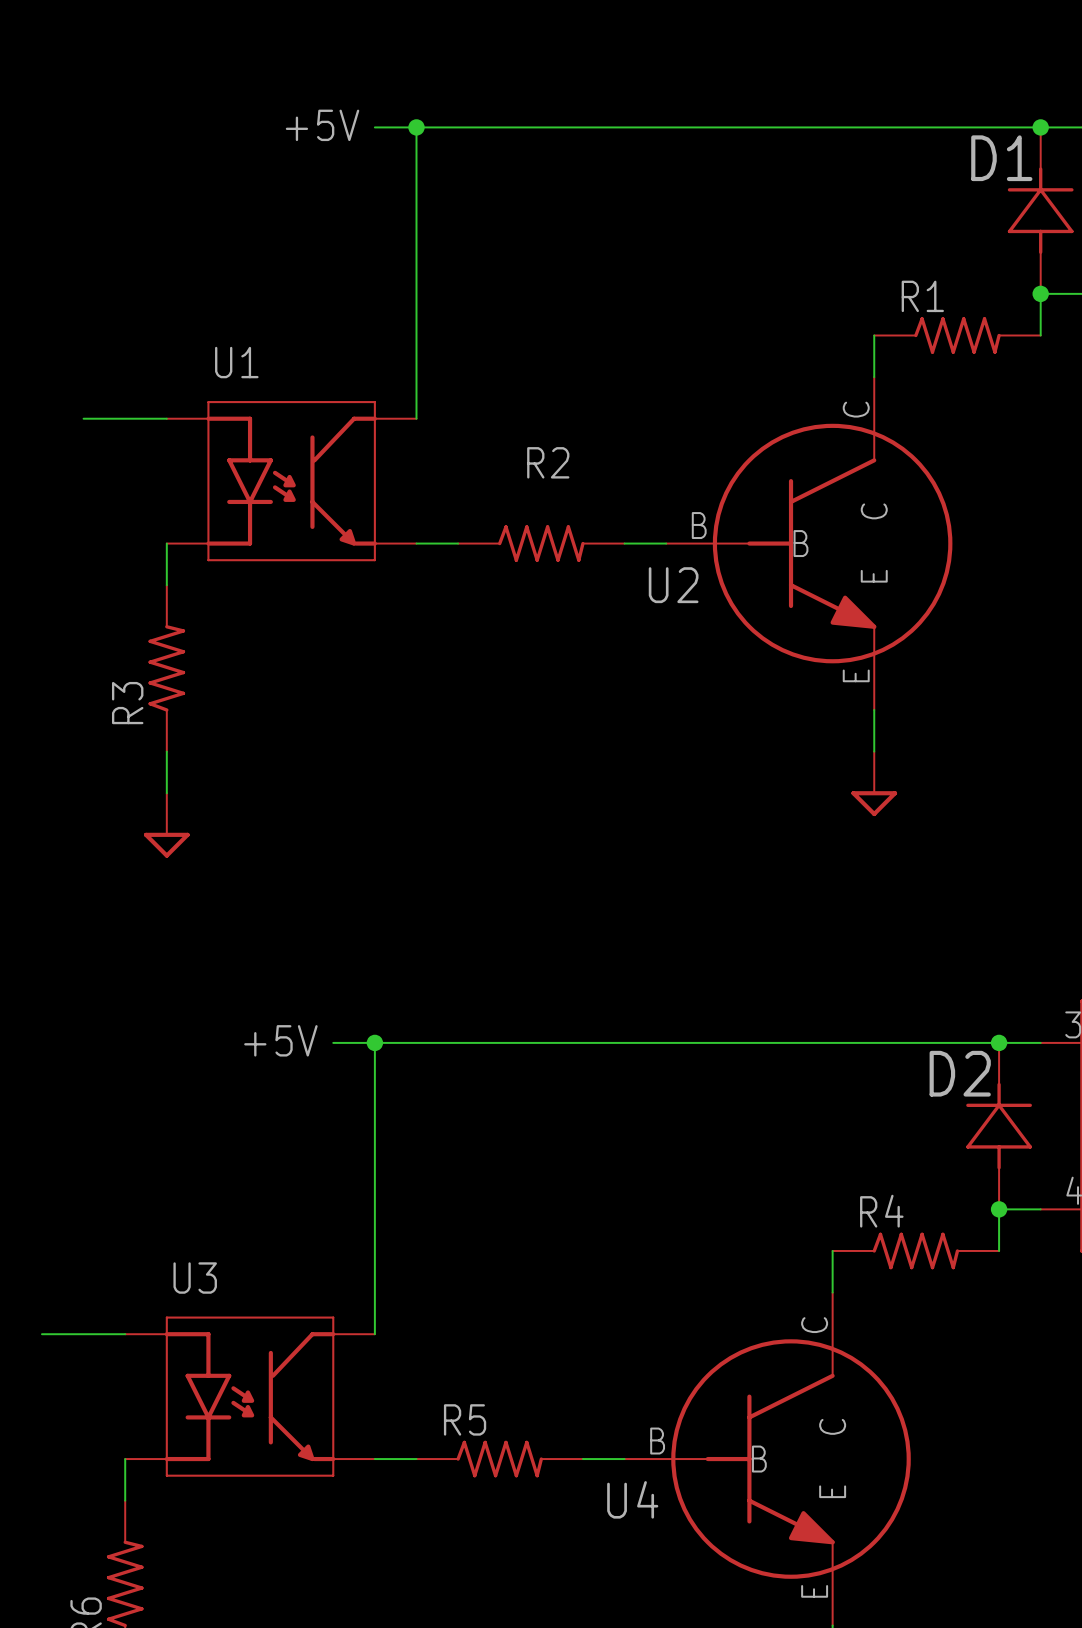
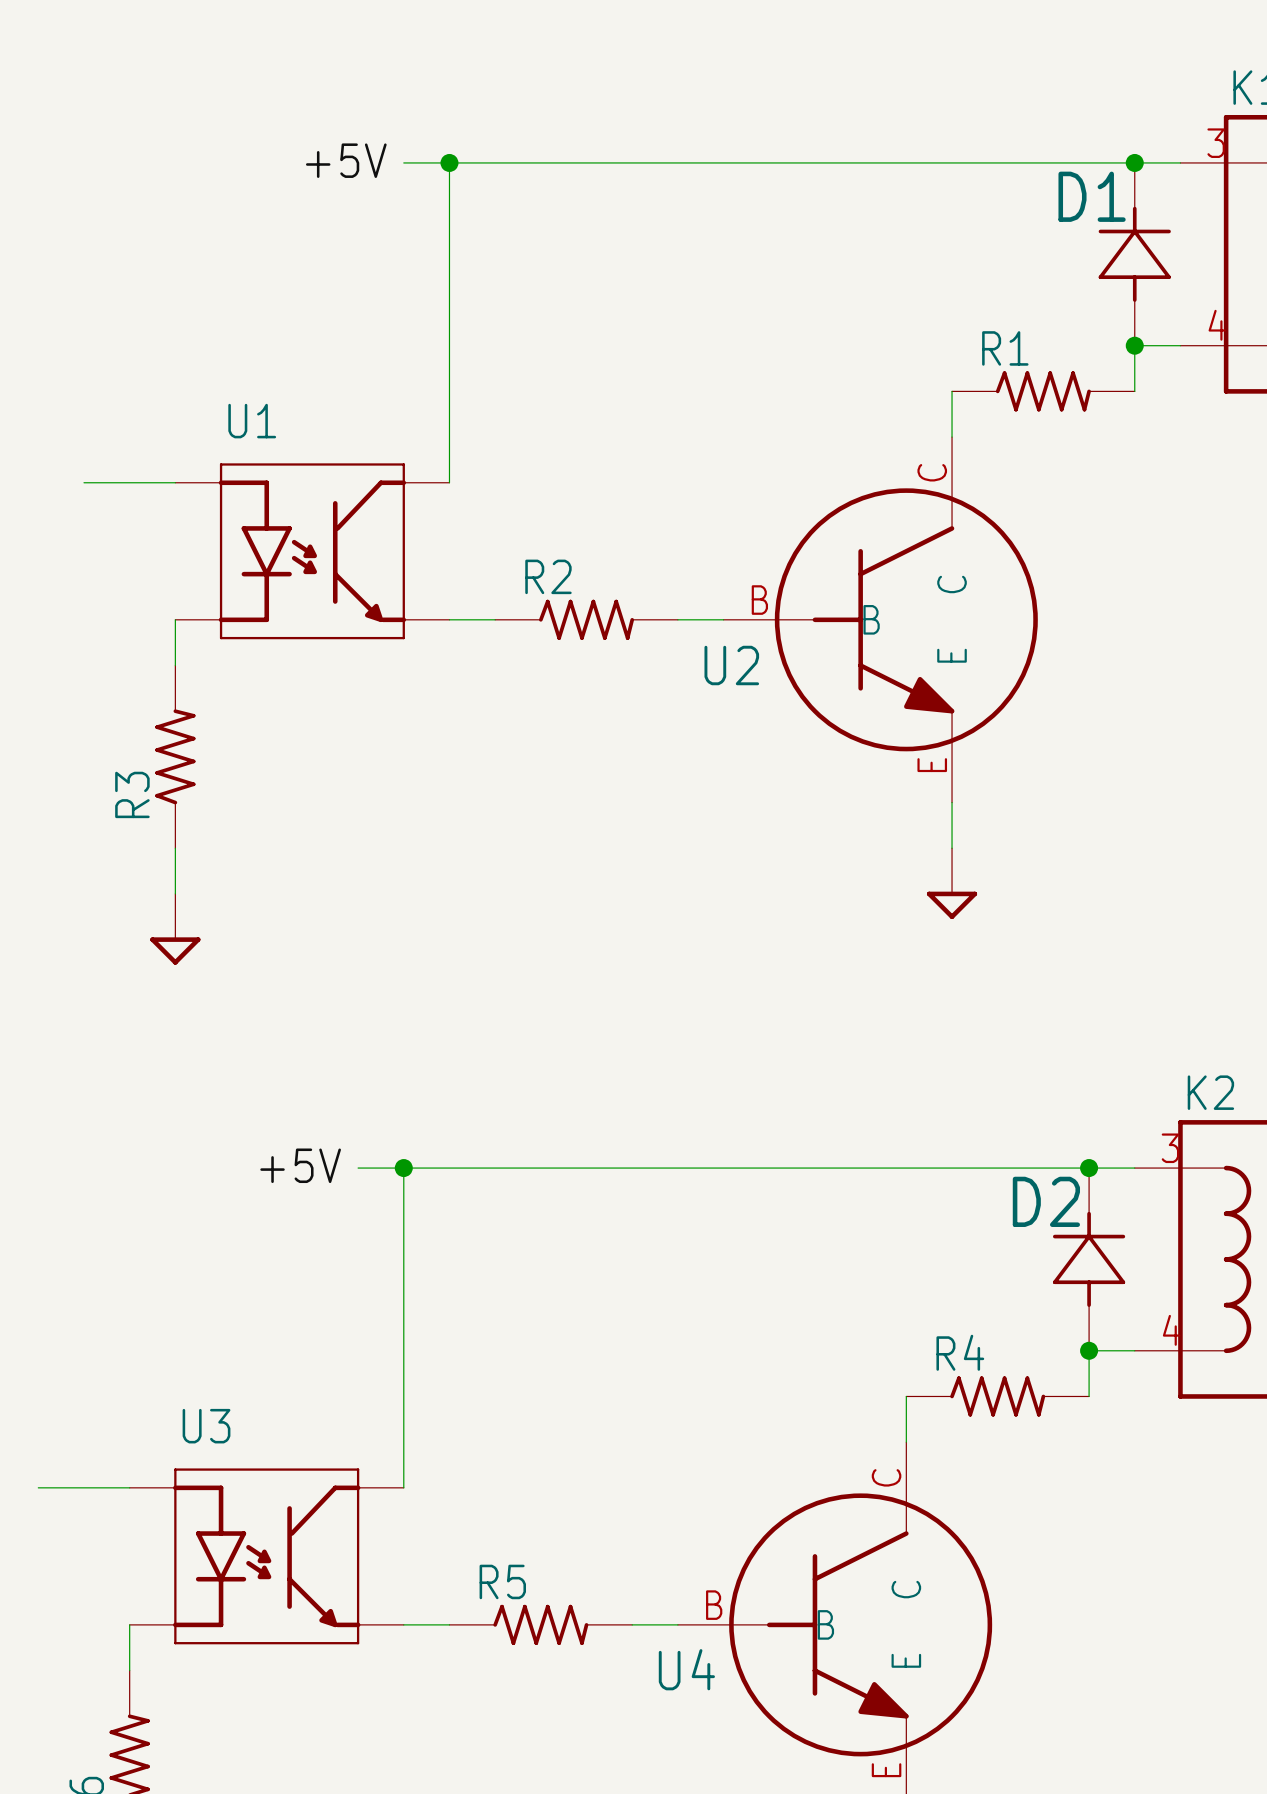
R2 name position: R2 (548, 462) -> R2 (548, 576)

